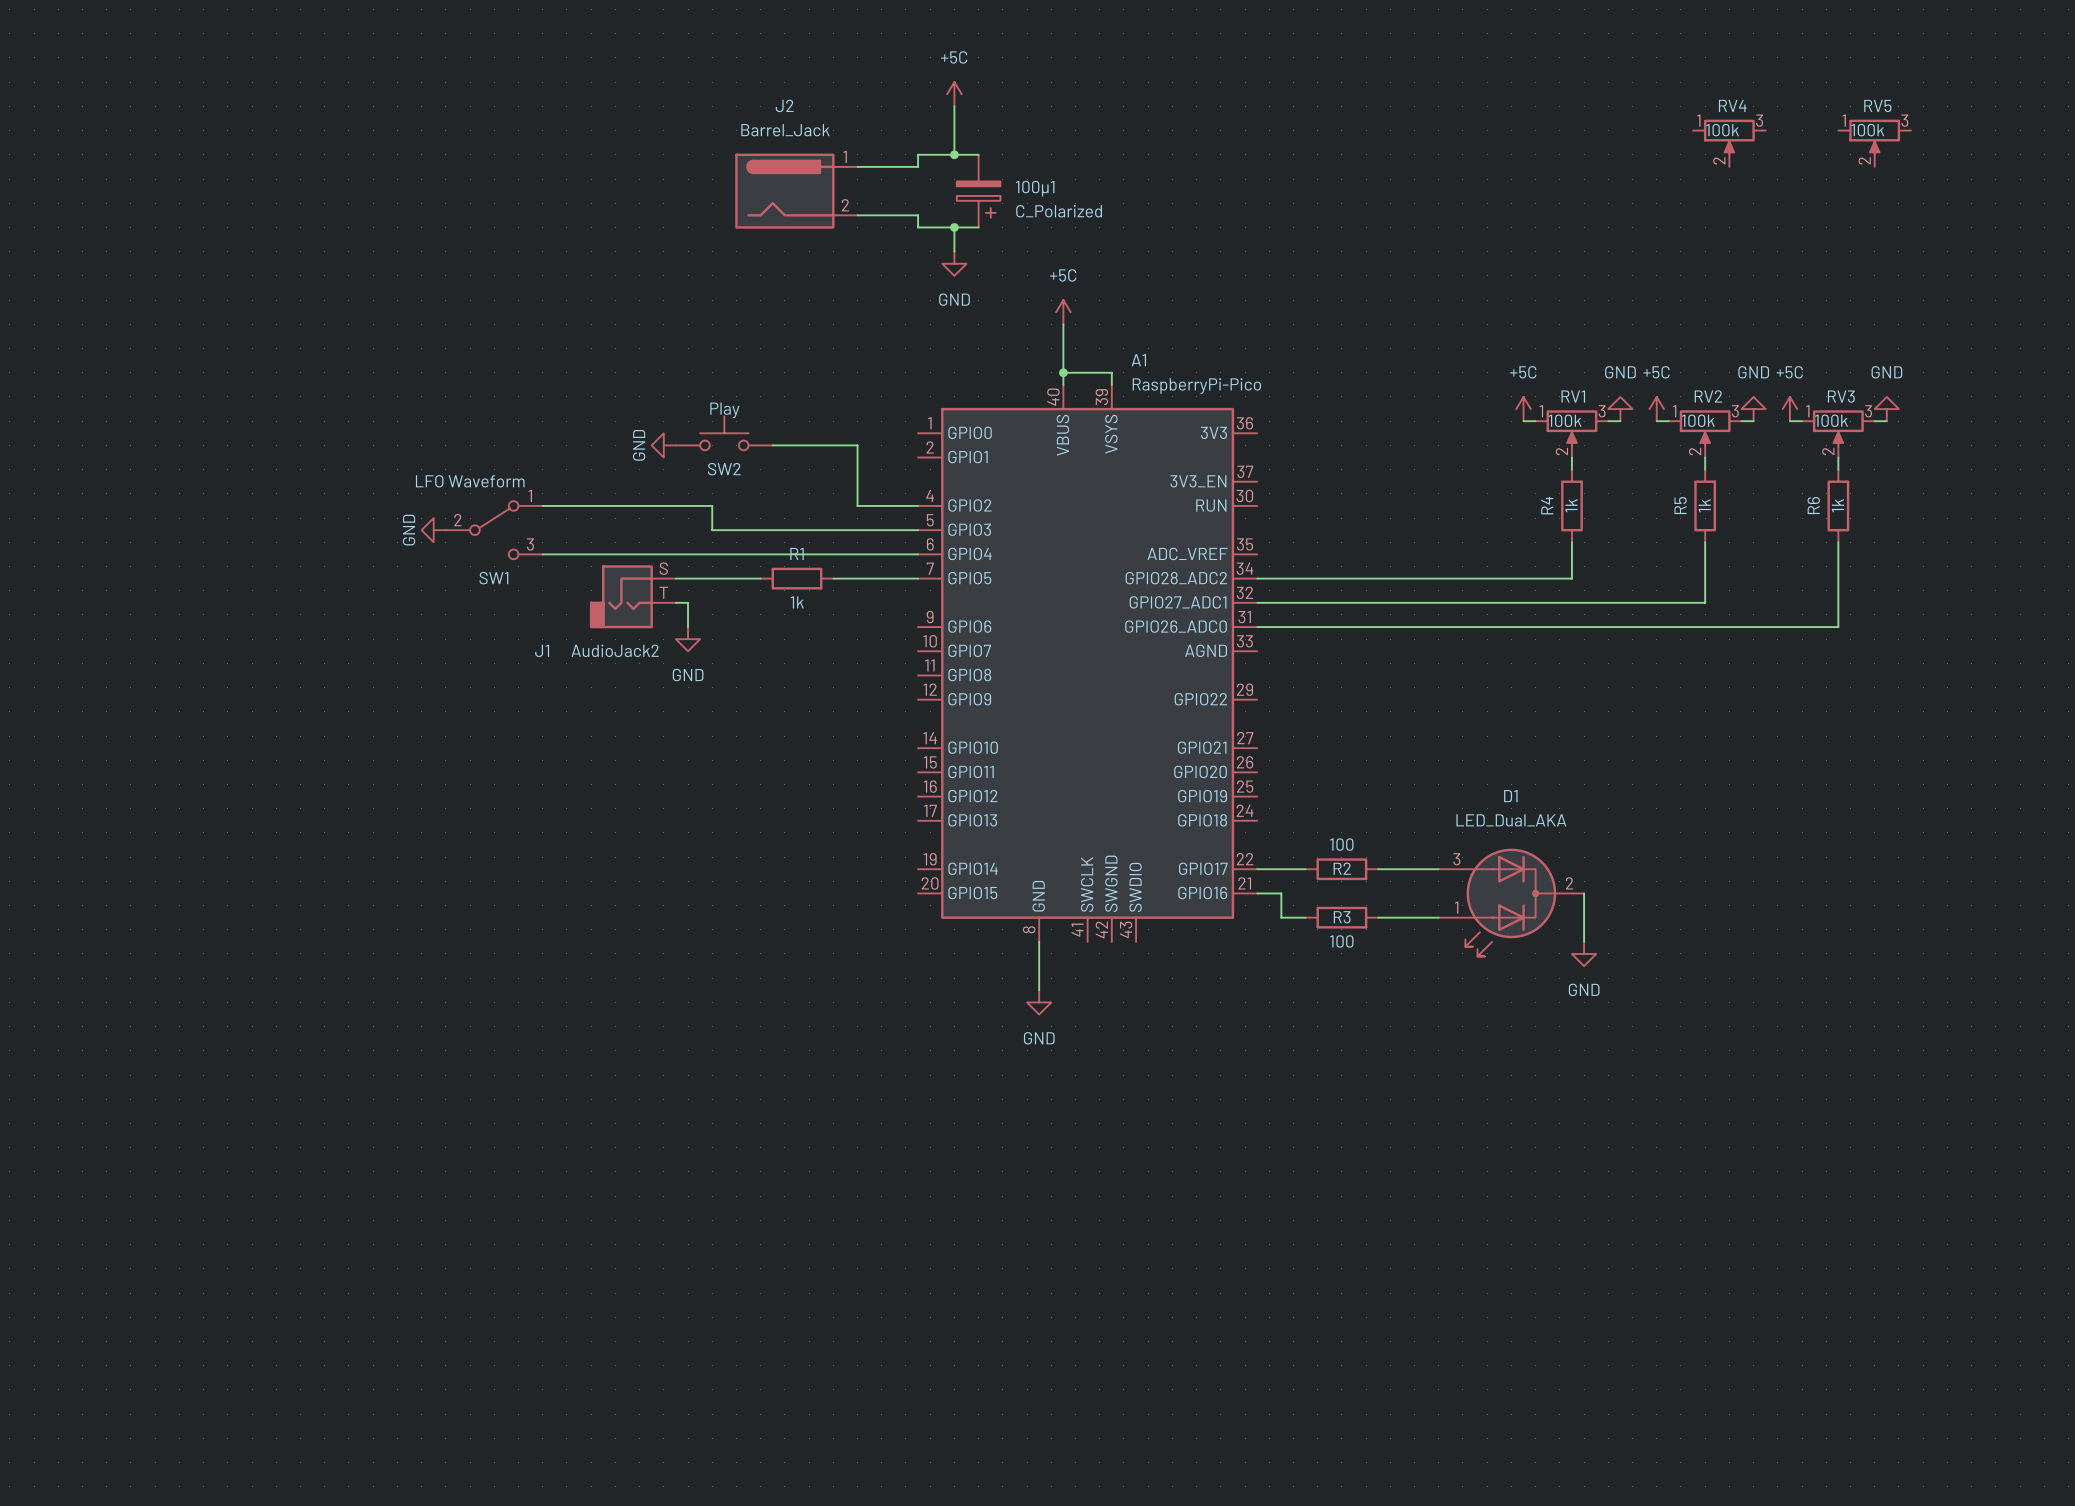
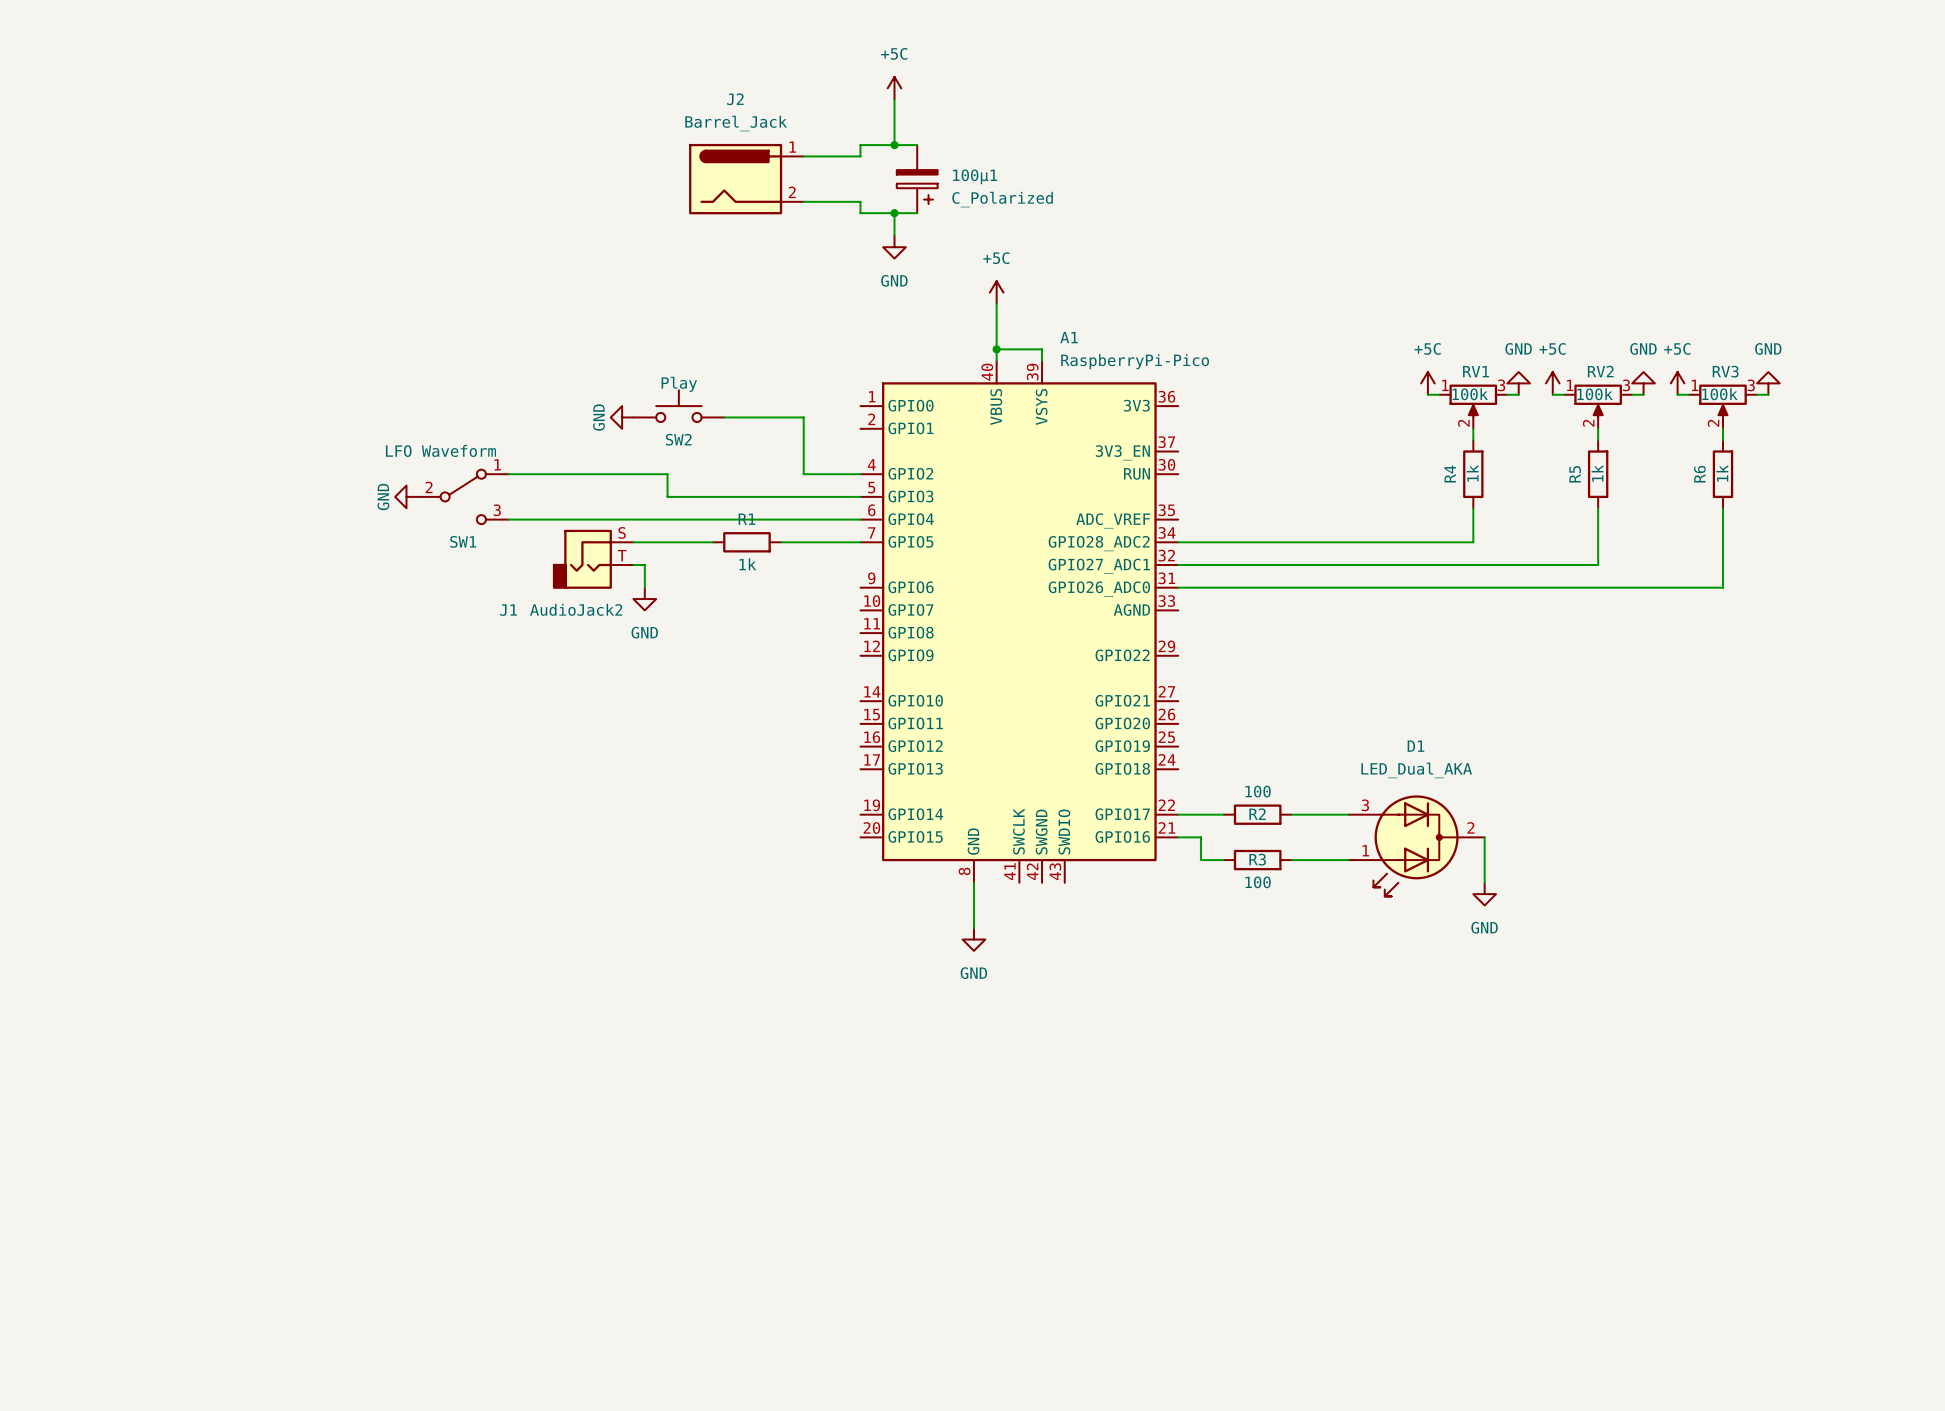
RV4: 100k (1729, 143) -> none
RV5: 100k (1874, 143) -> none

